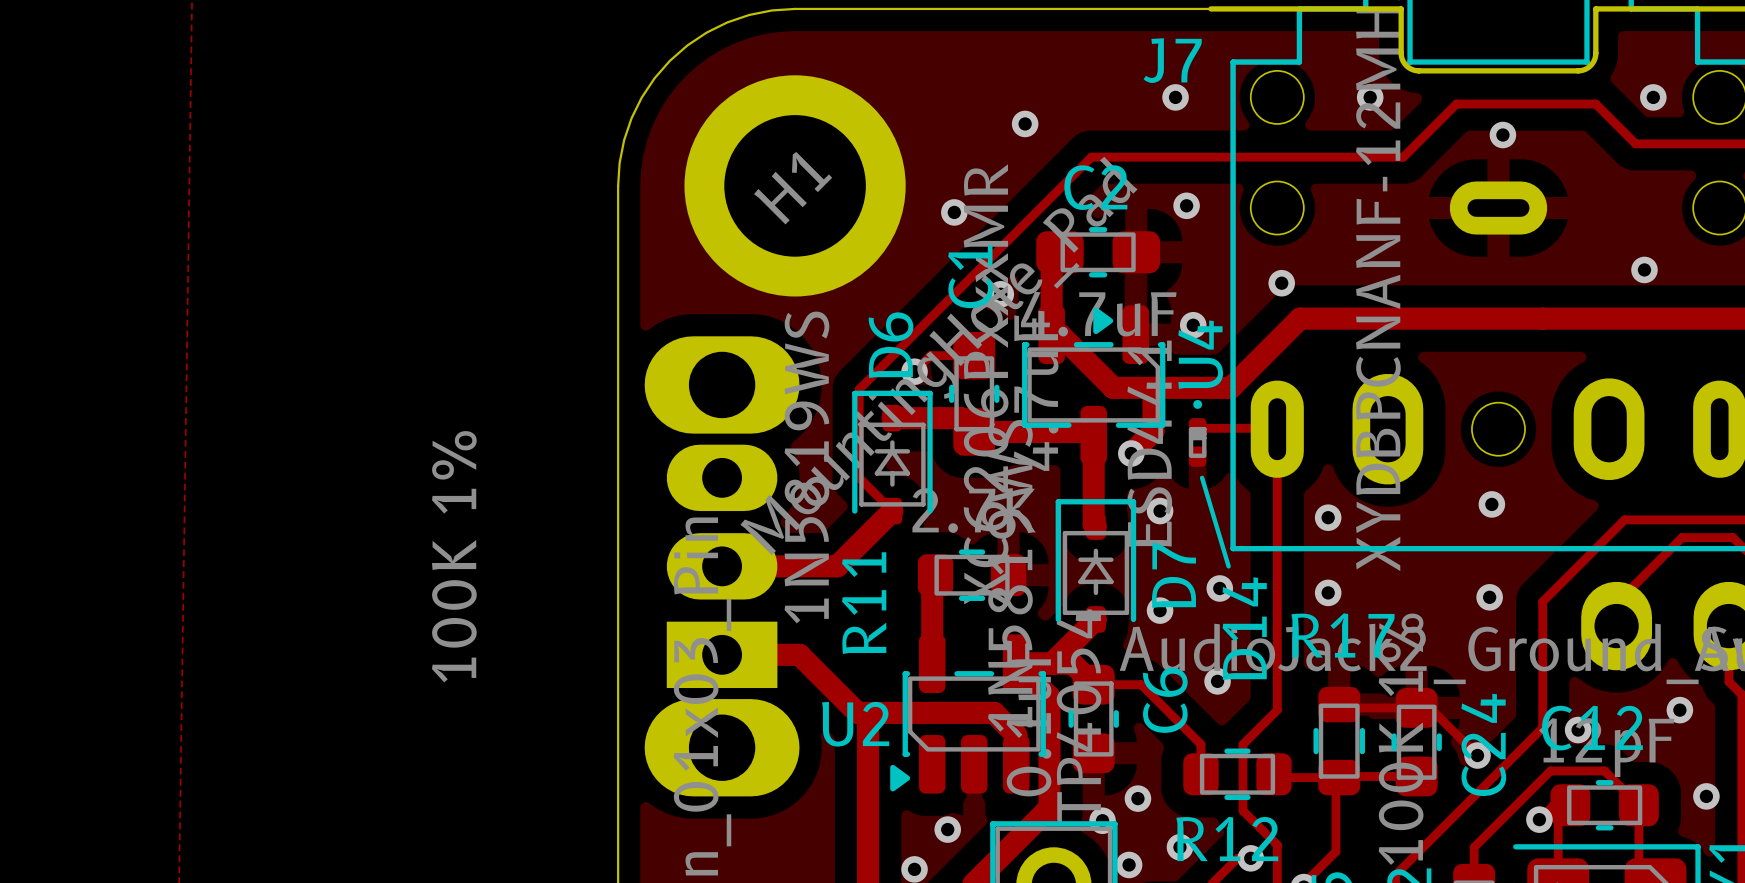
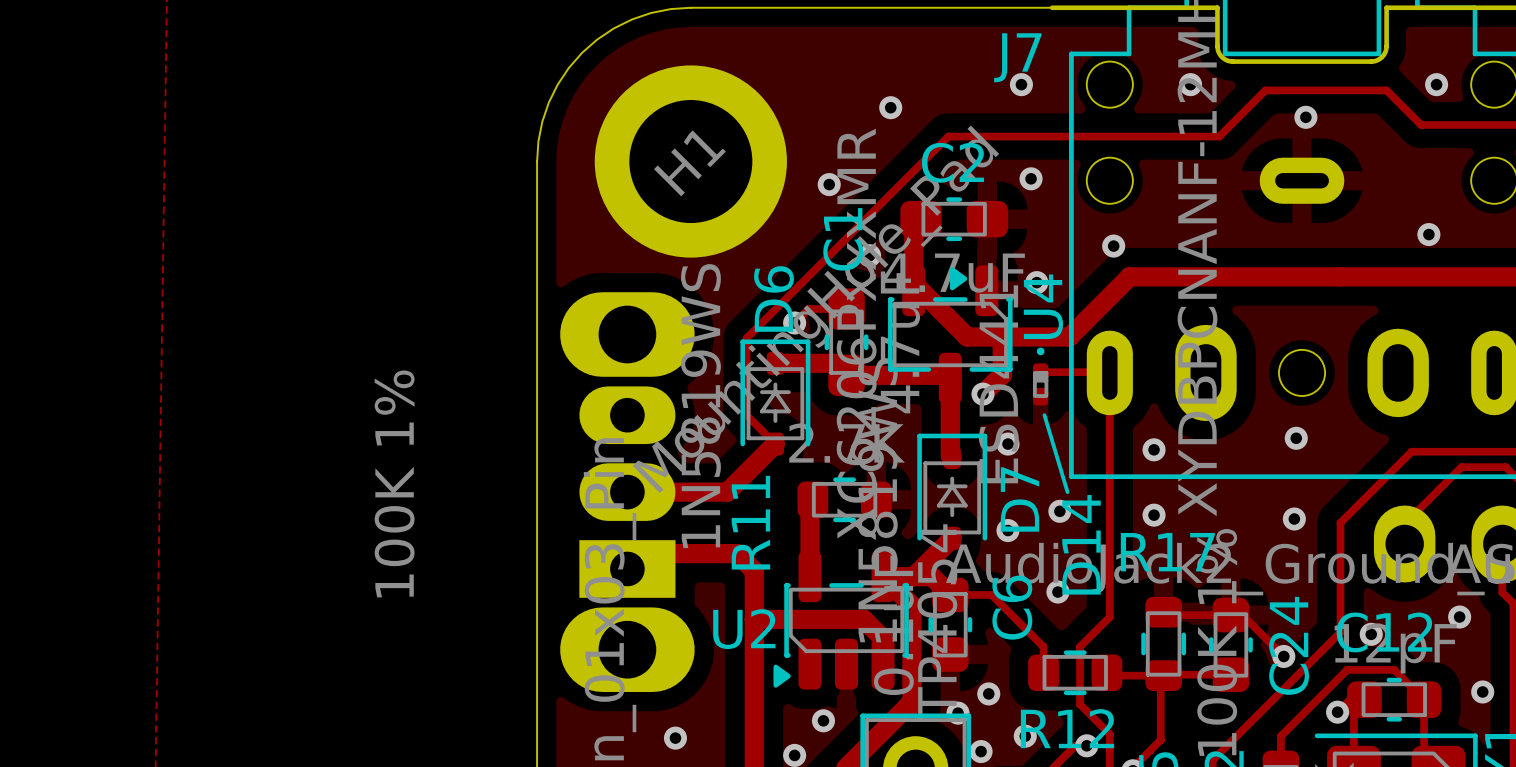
track: (722, 654) (799, 654) (857, 712) (868, 712) -> (627, 568) (642, 553) (736, 553) (754, 570) (754, 619)
via: none -> (675, 738)

